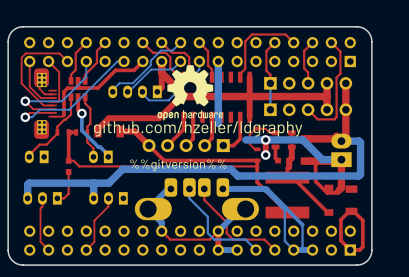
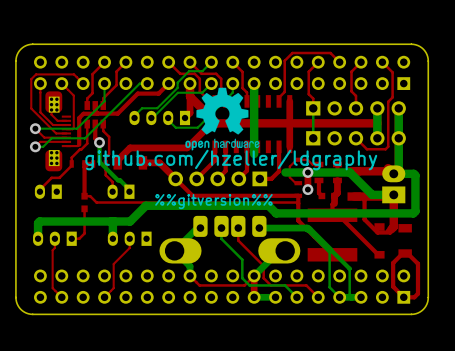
bottom track: none -> (377, 108) (377, 138)
bottom track: none -> (398, 108) (398, 168) (393, 173)

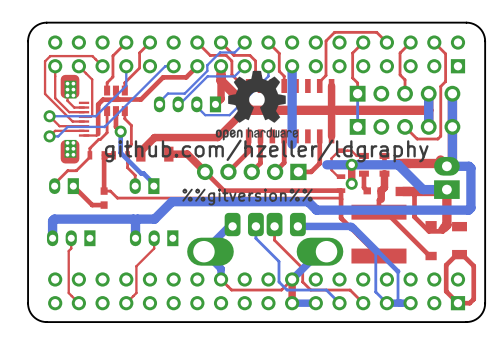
top track: (84, 208) (84, 233) (79, 238) (71, 238) -> (104, 205) (92, 205) (73, 186)

